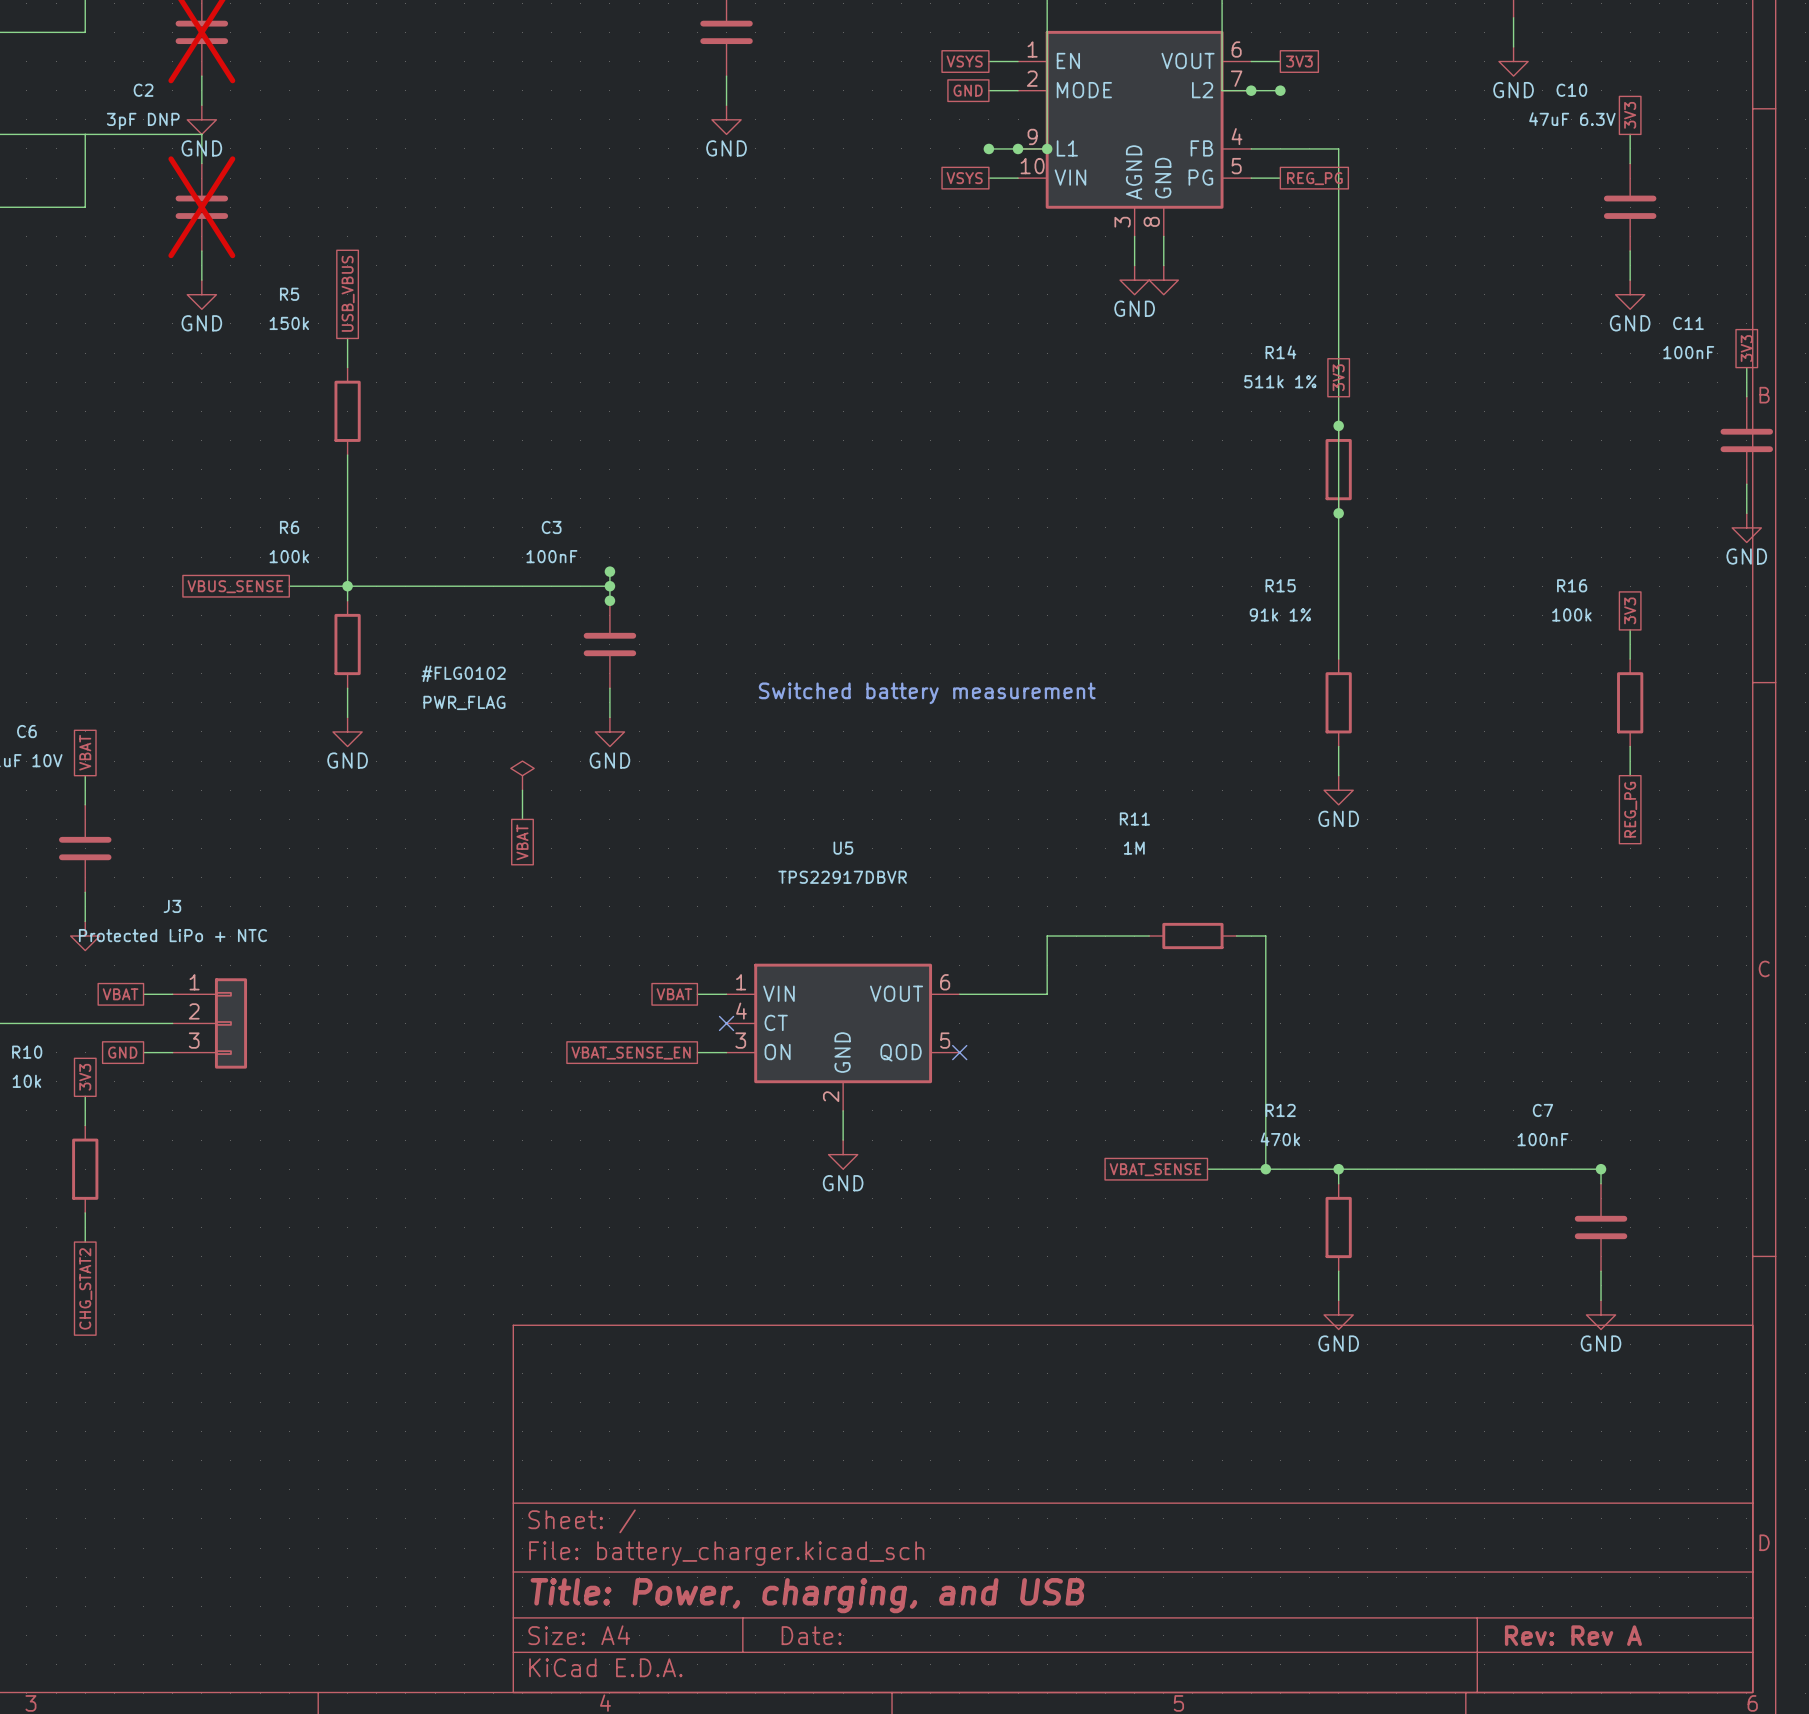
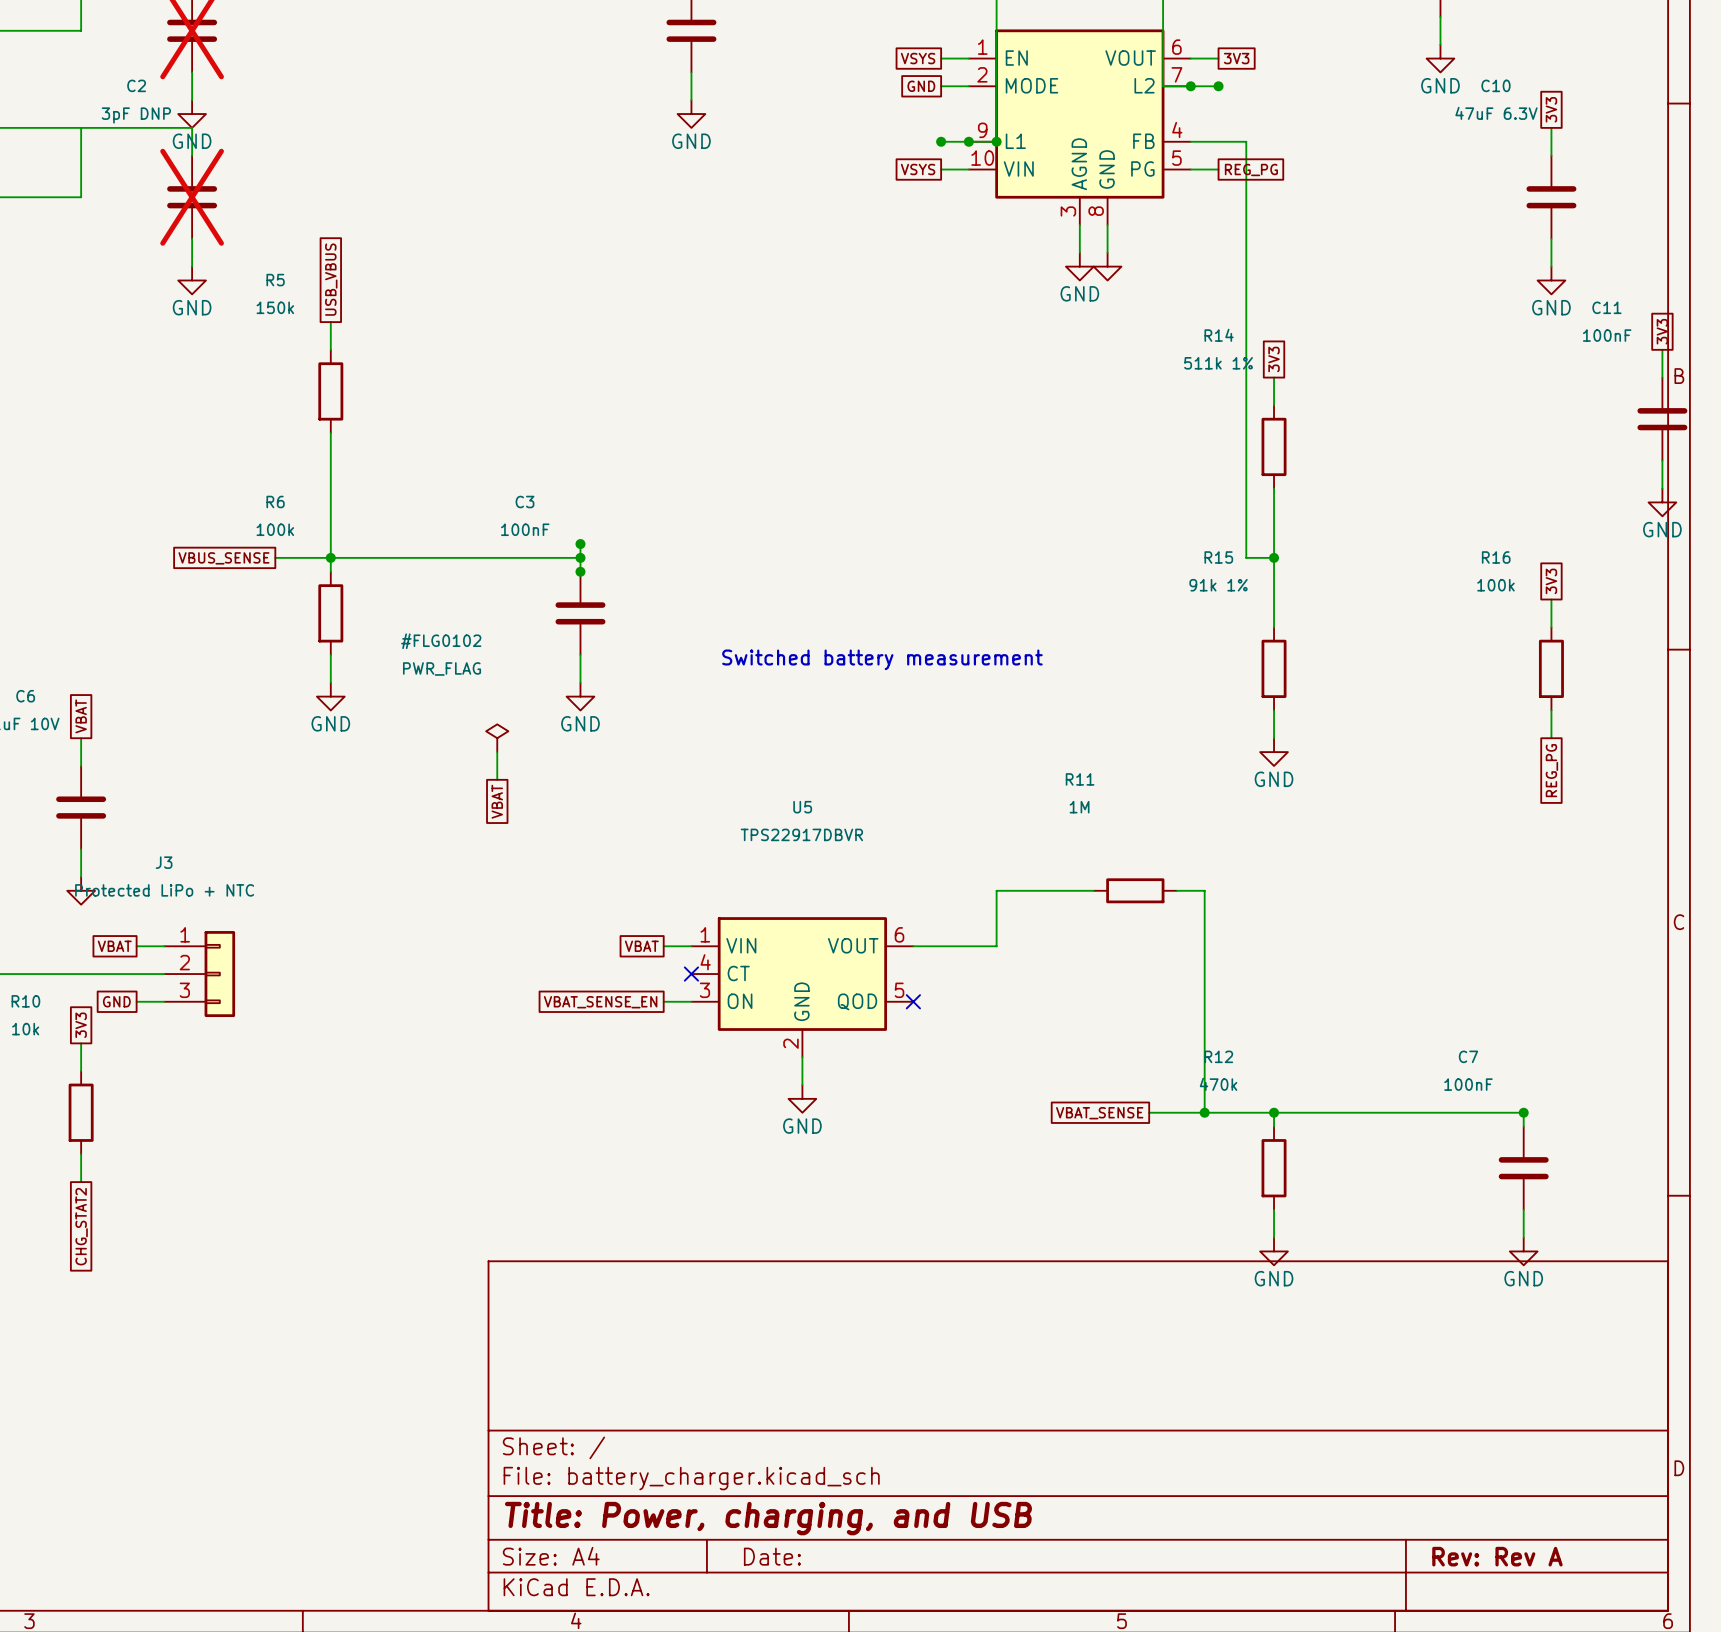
wire: (1309, 148) (1338, 148) (1338, 396) -> (1246, 141) (1246, 557) (1274, 557)
wire: (1338, 425) (1338, 513) -> none
junction: (1338, 425) -> none
junction: (1338, 513) -> none
junction: none -> (1274, 557)

